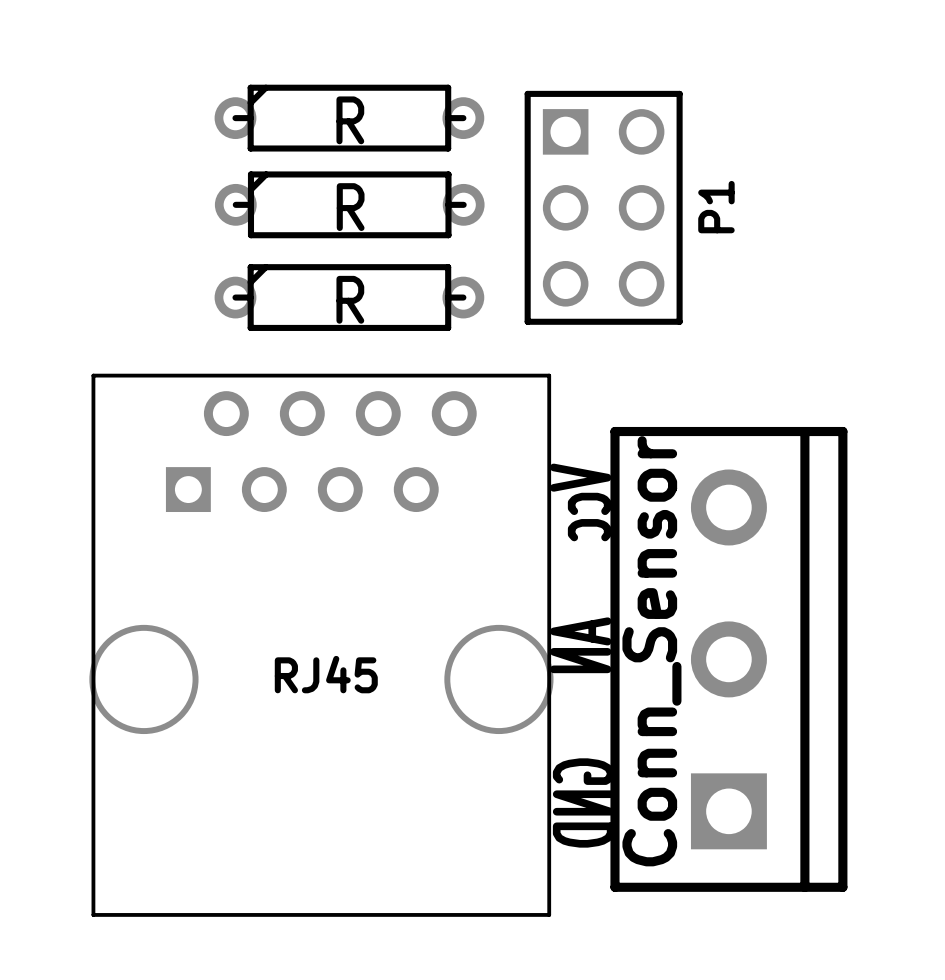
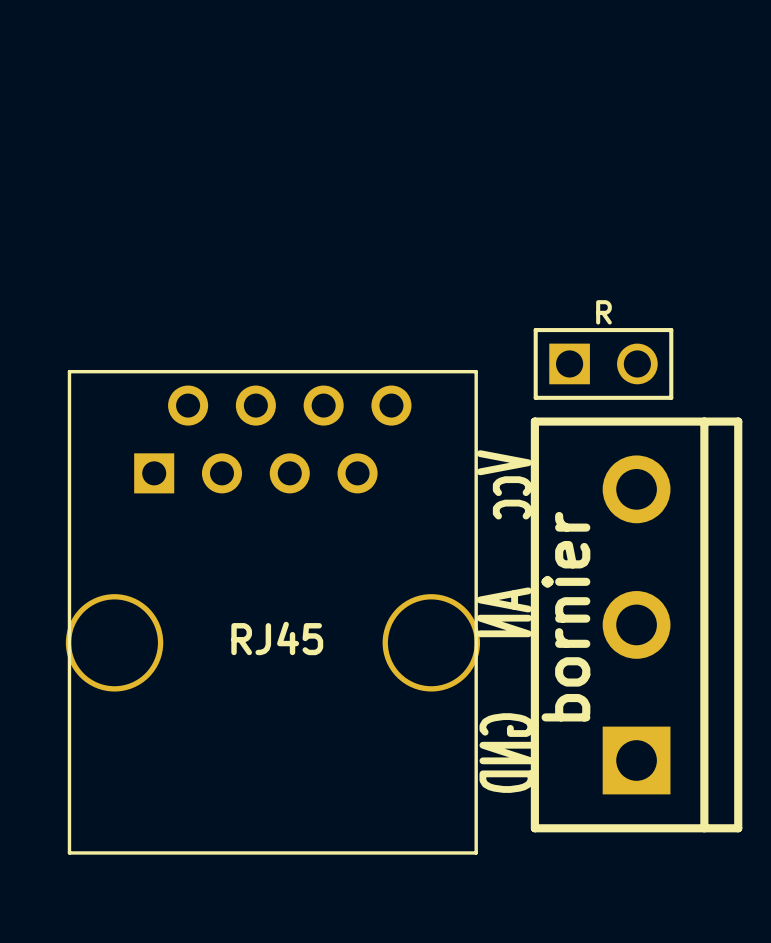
part: R (349, 118) -> none
part: R (349, 204) -> none
P1: (603, 207) -> none
part: R (349, 297) -> none
part: none -> R (603, 363)
part value: Conn_Sensor (651, 651) -> bornier (565, 616)

